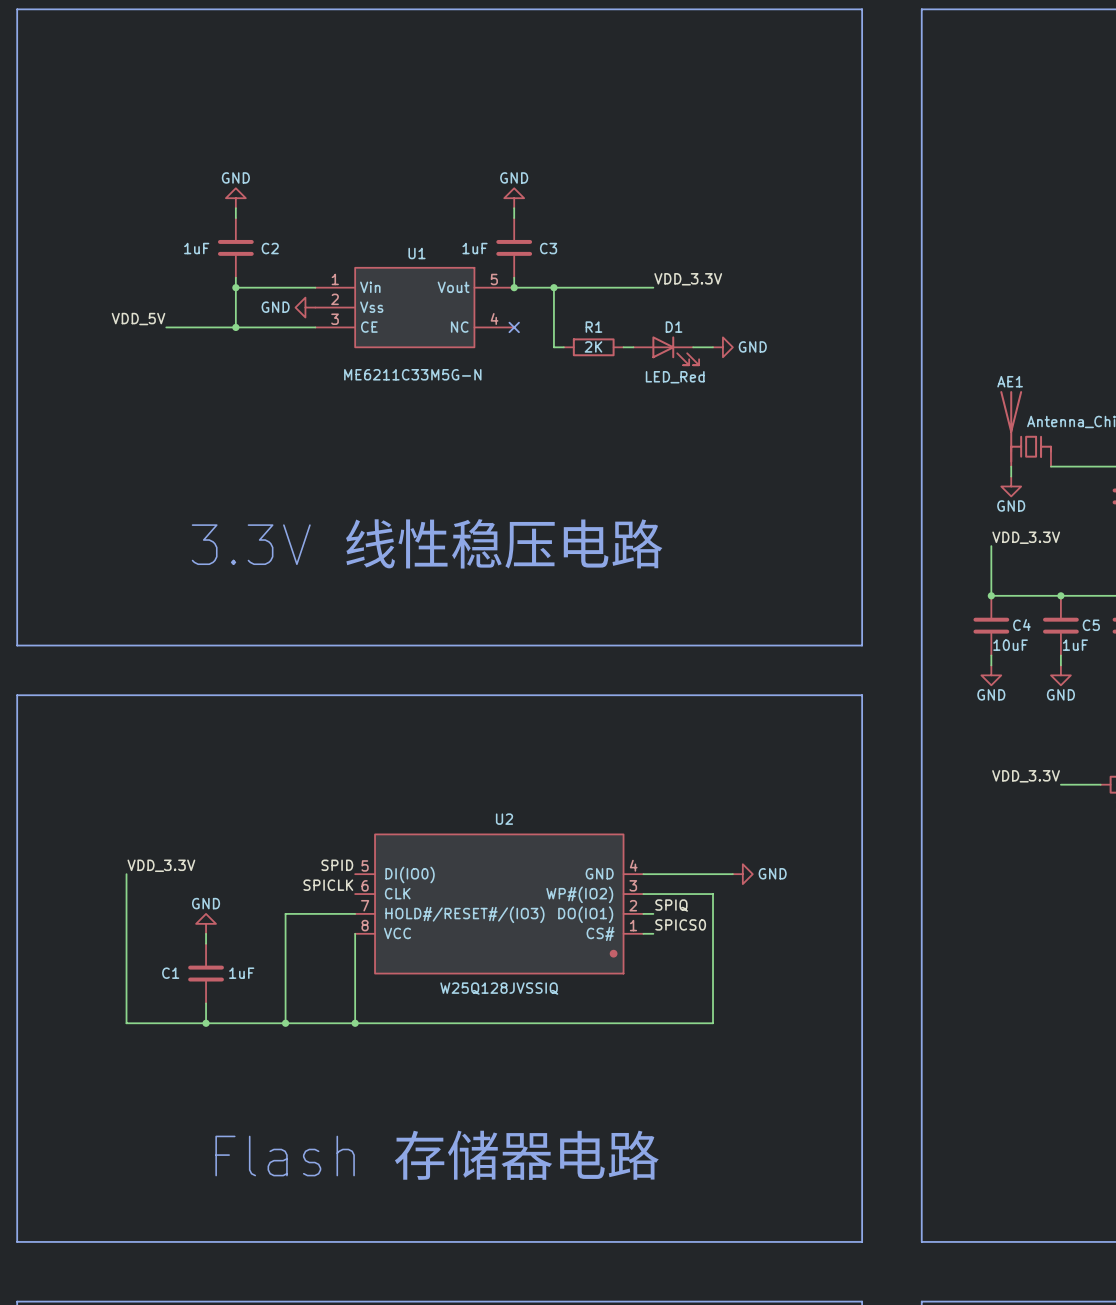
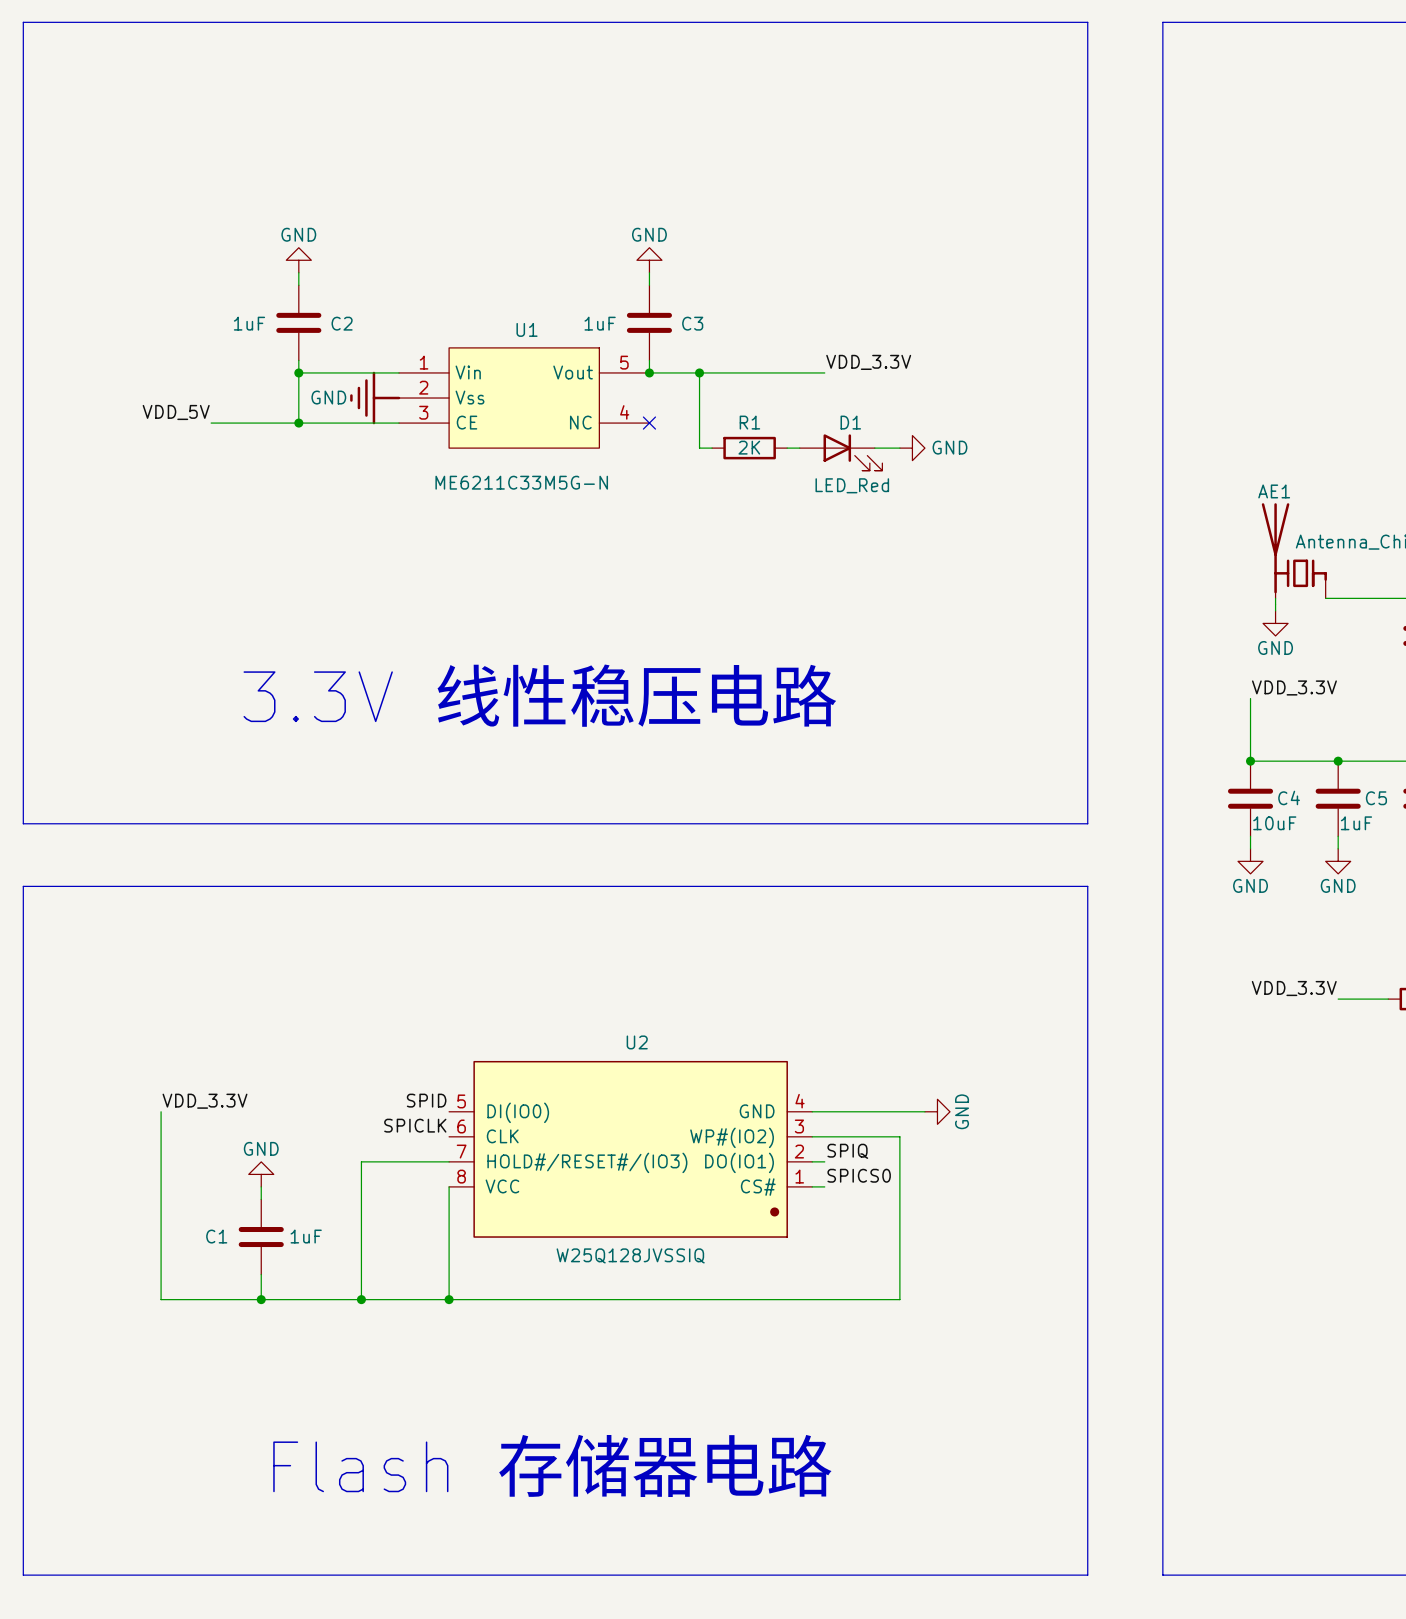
power symbol: none -> GND (375, 398)
power symbol: GND (305, 307) -> none
power symbol text rotation: 0° (772, 873) -> 90° counterclockwise (962, 1111)

